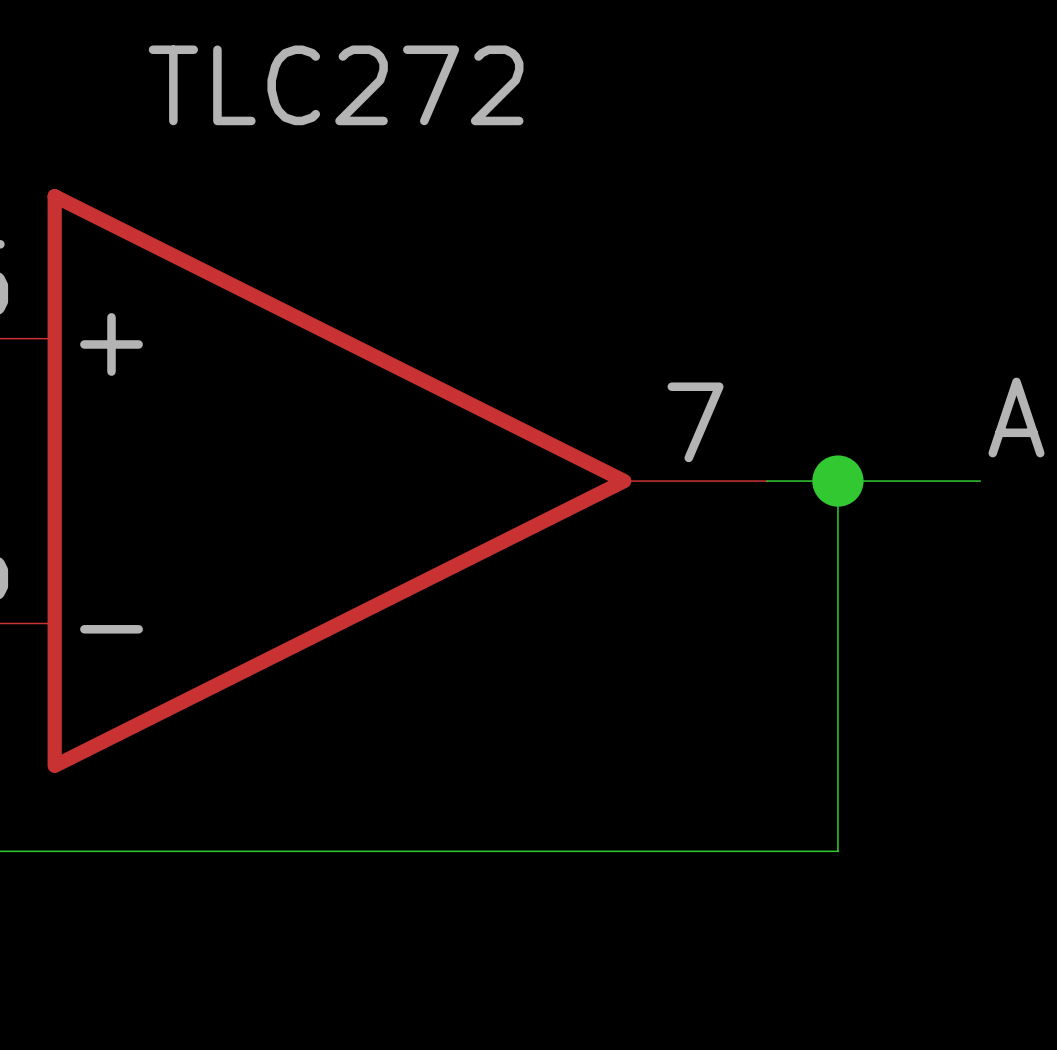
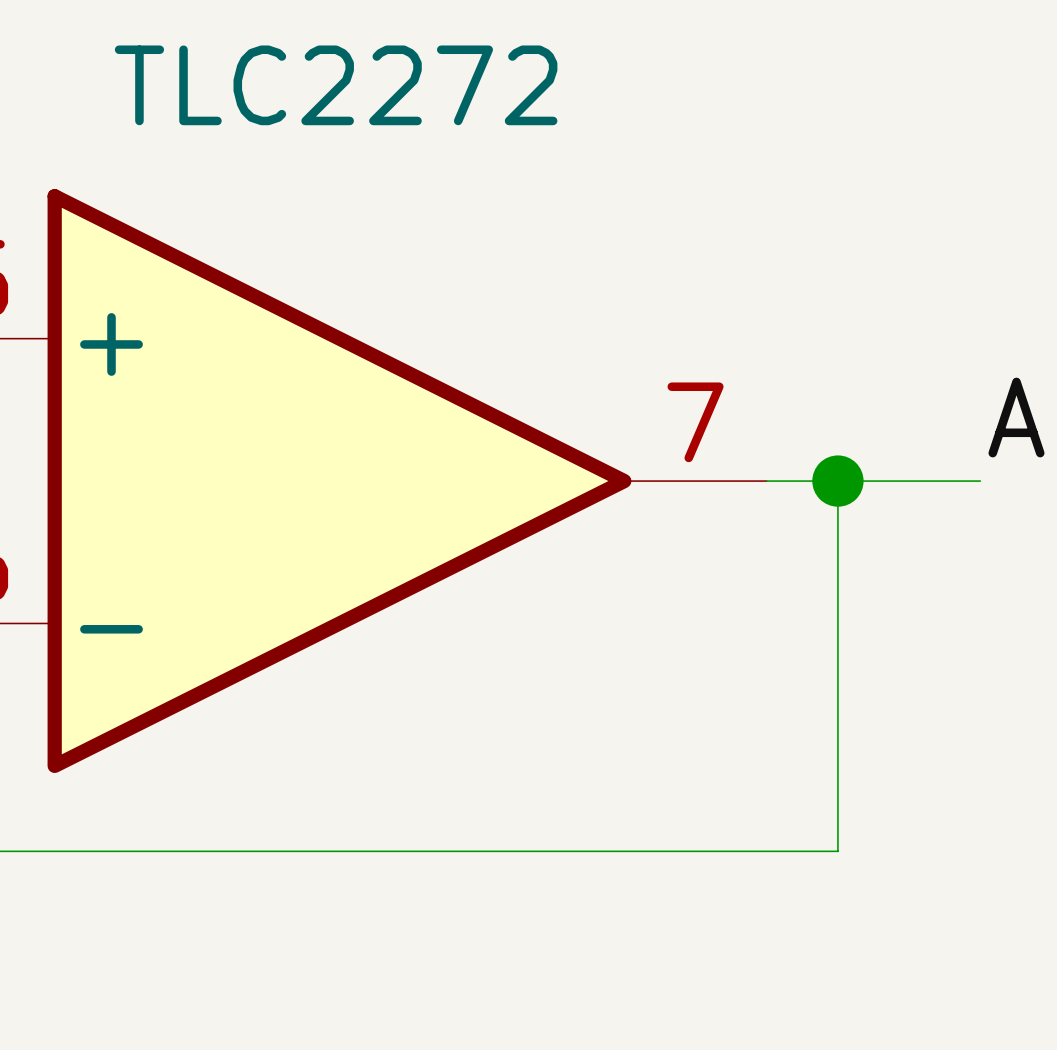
part value: TLC272 (336, 85) -> TLC2272 (336, 85)

